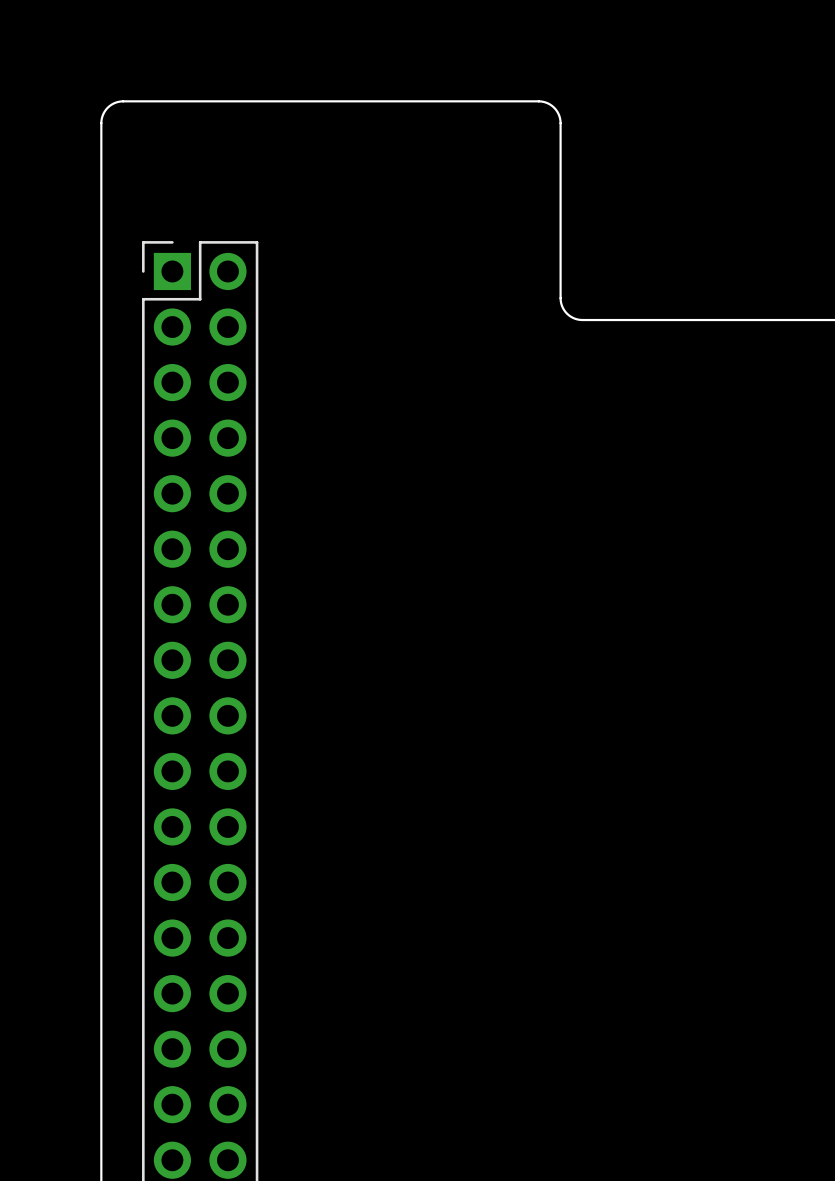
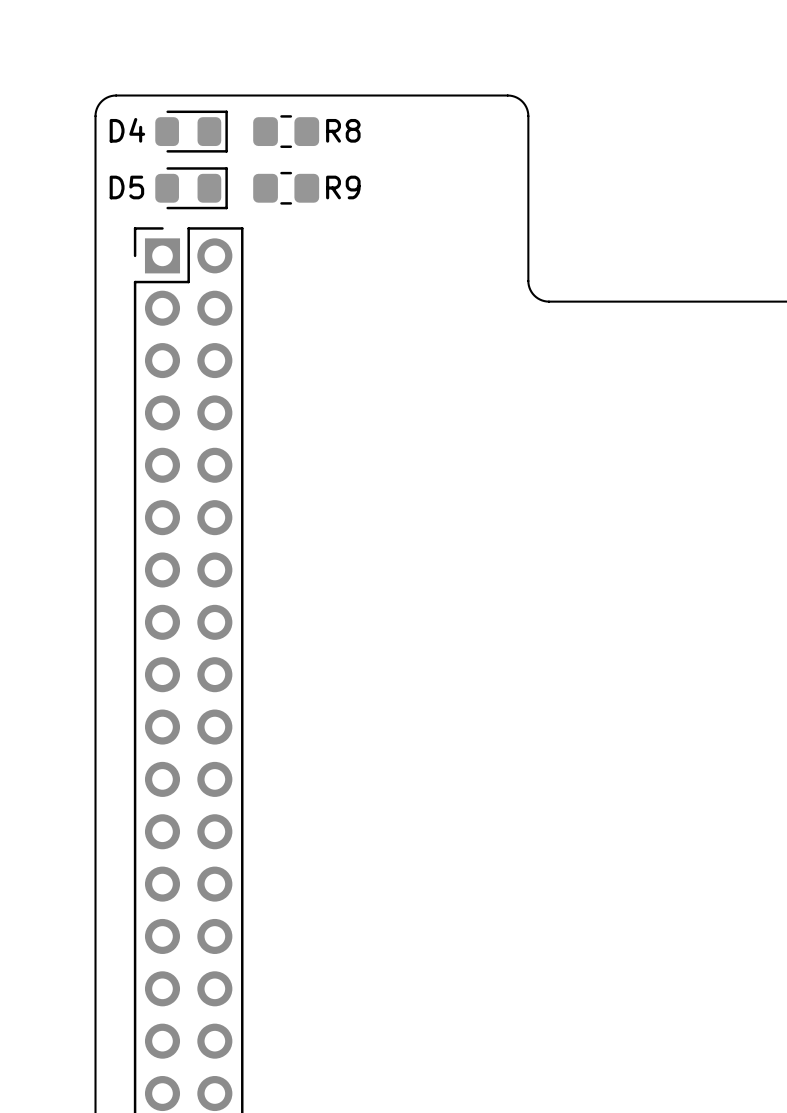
D4: none -> (191, 131)
R8: none -> (286, 131)
D5: none -> (191, 188)
R9: none -> (286, 188)

